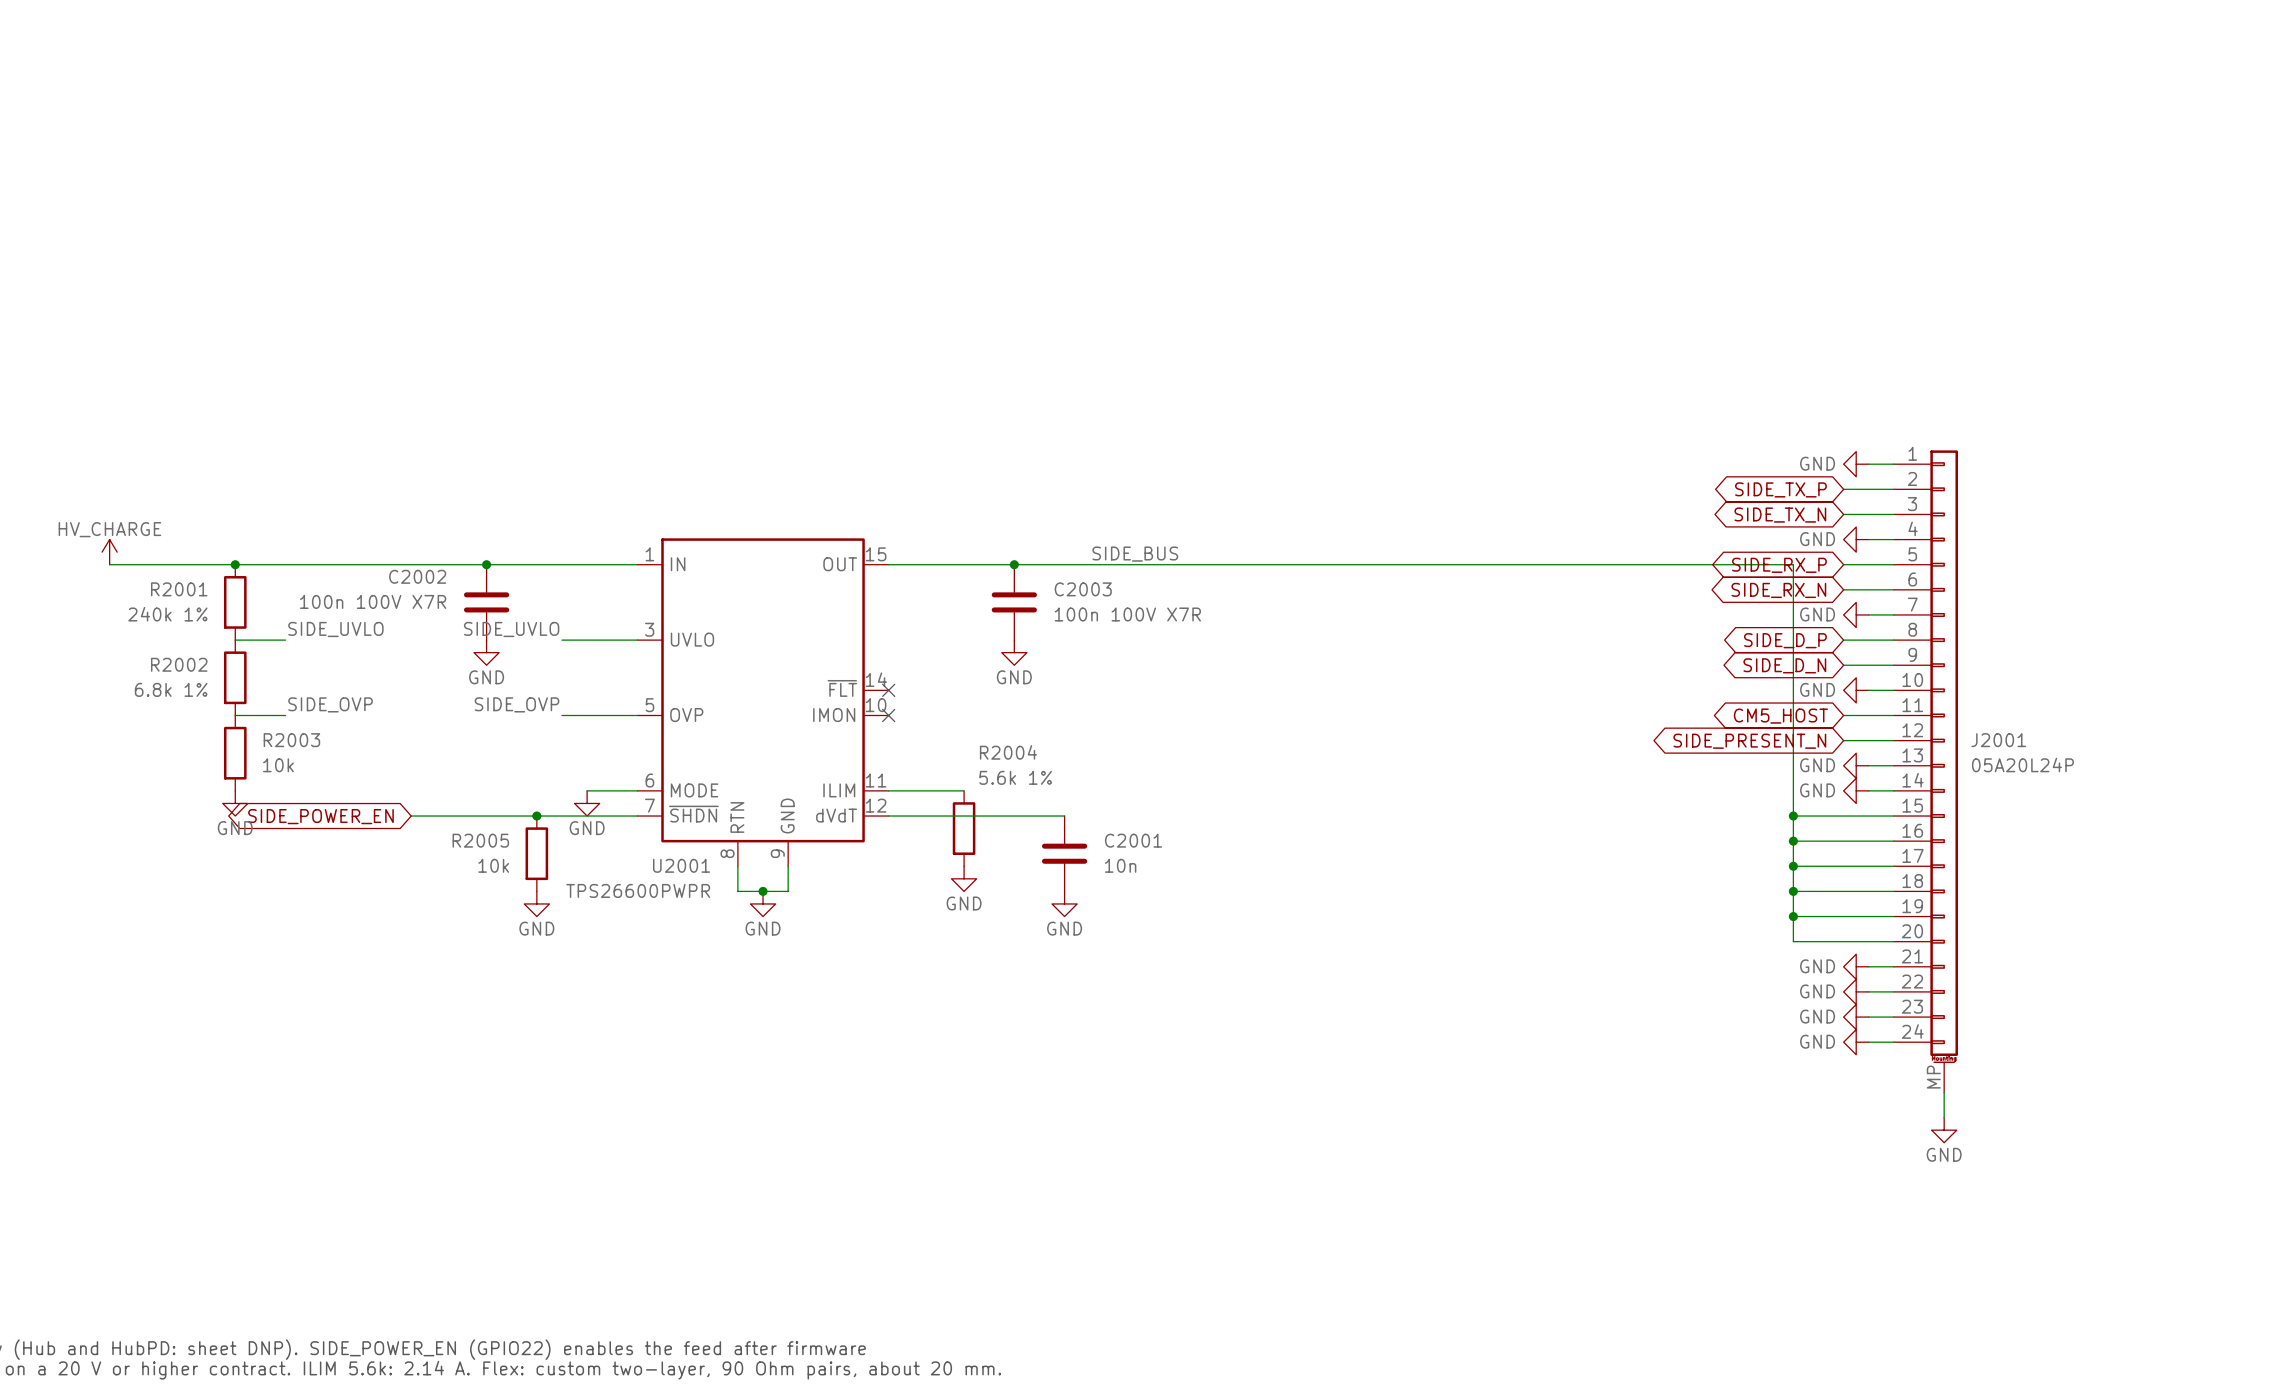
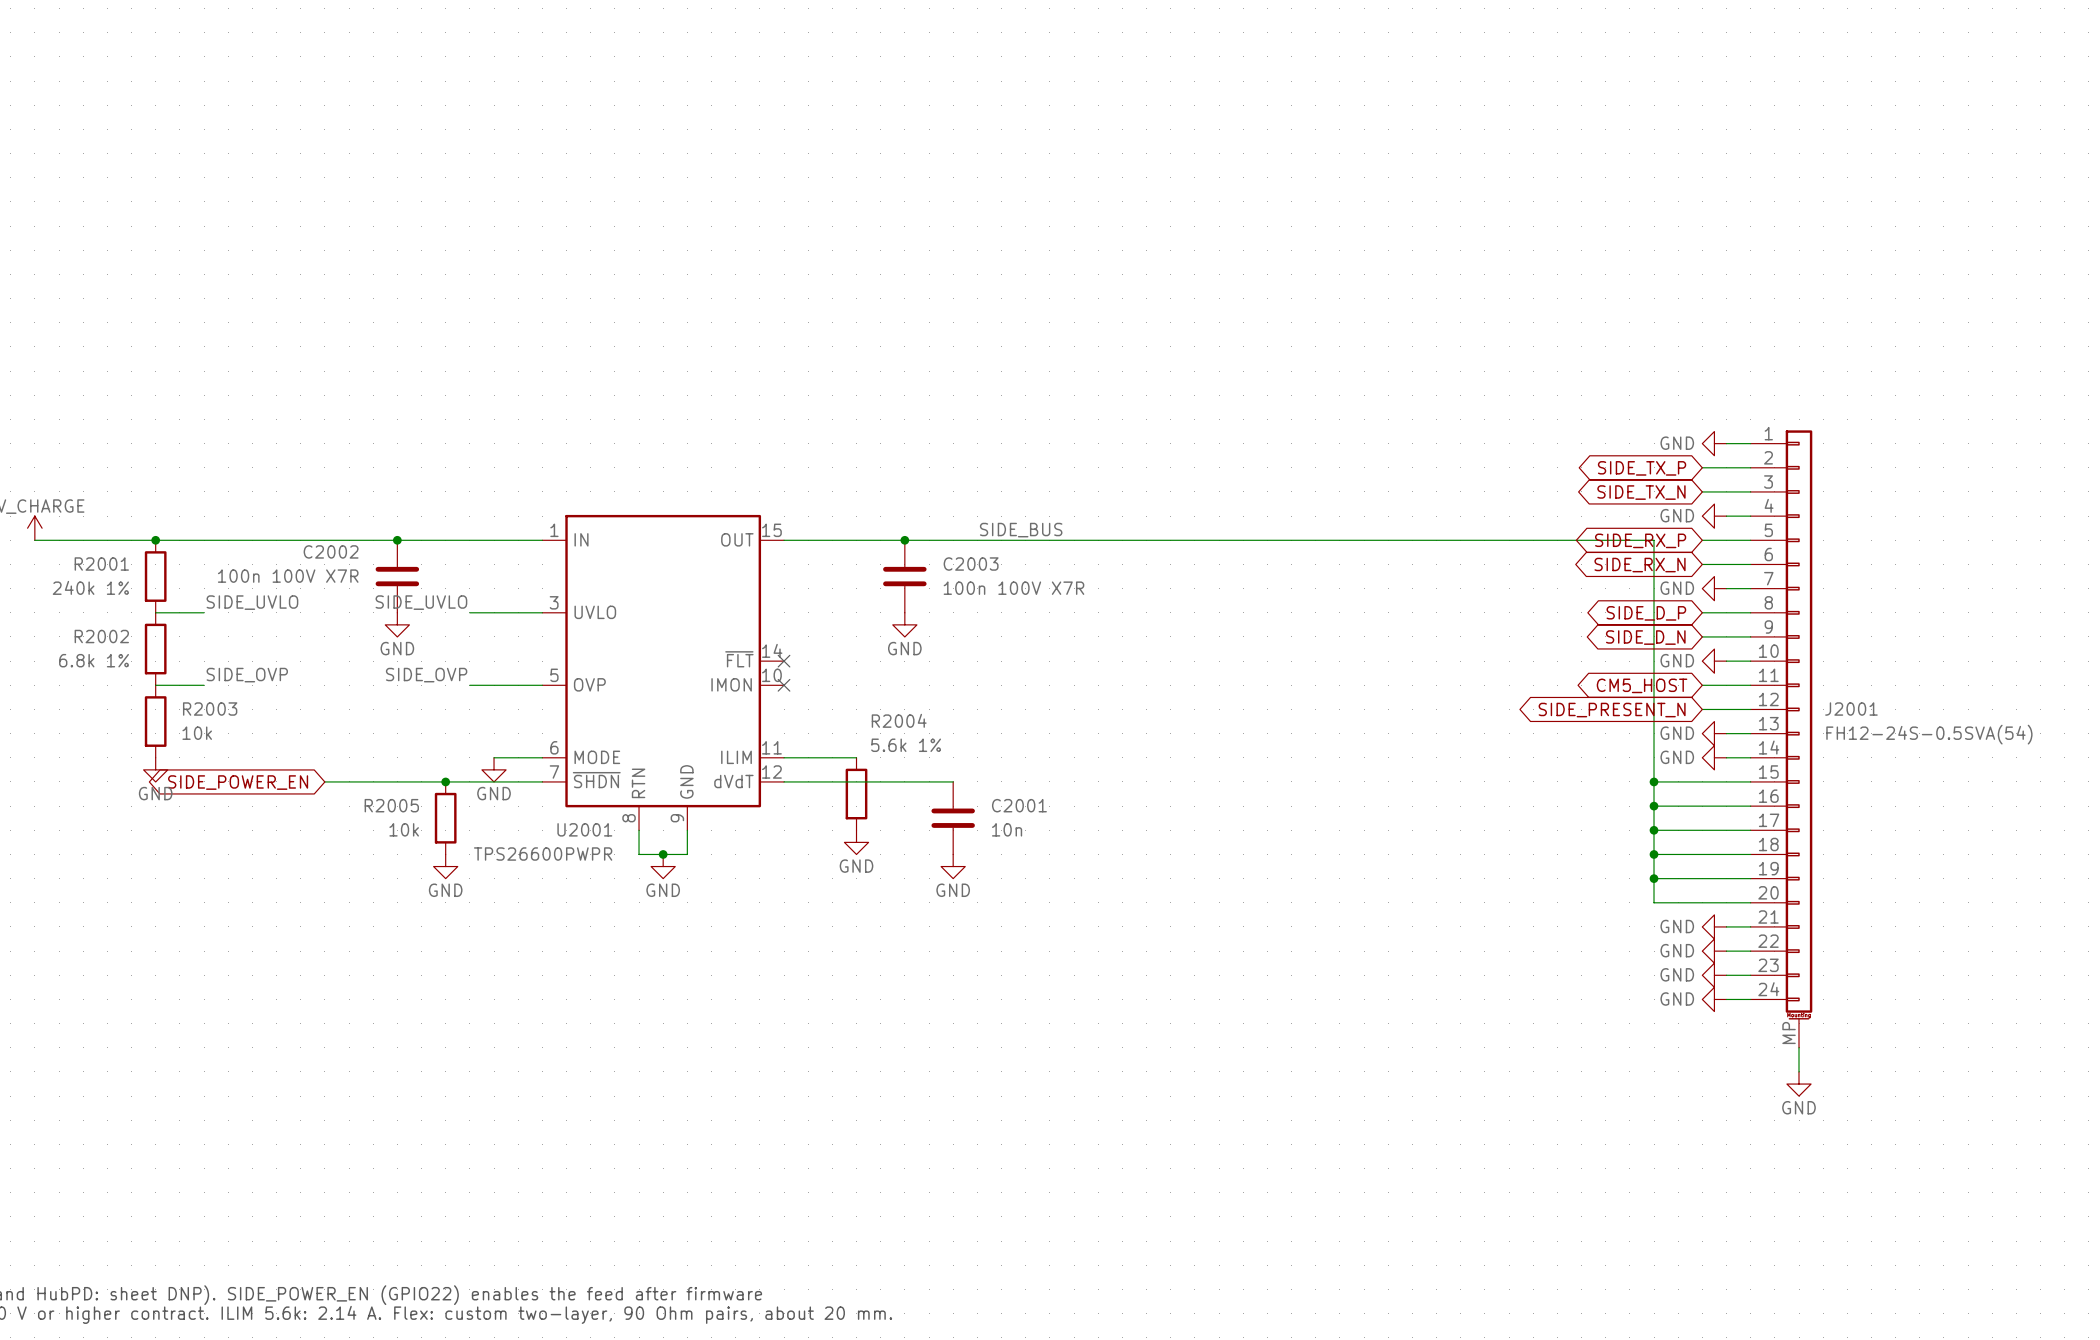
J2001 value: 05A20L24P (2022, 764) -> FH12-24S-0.5SVA(54) (1929, 734)

